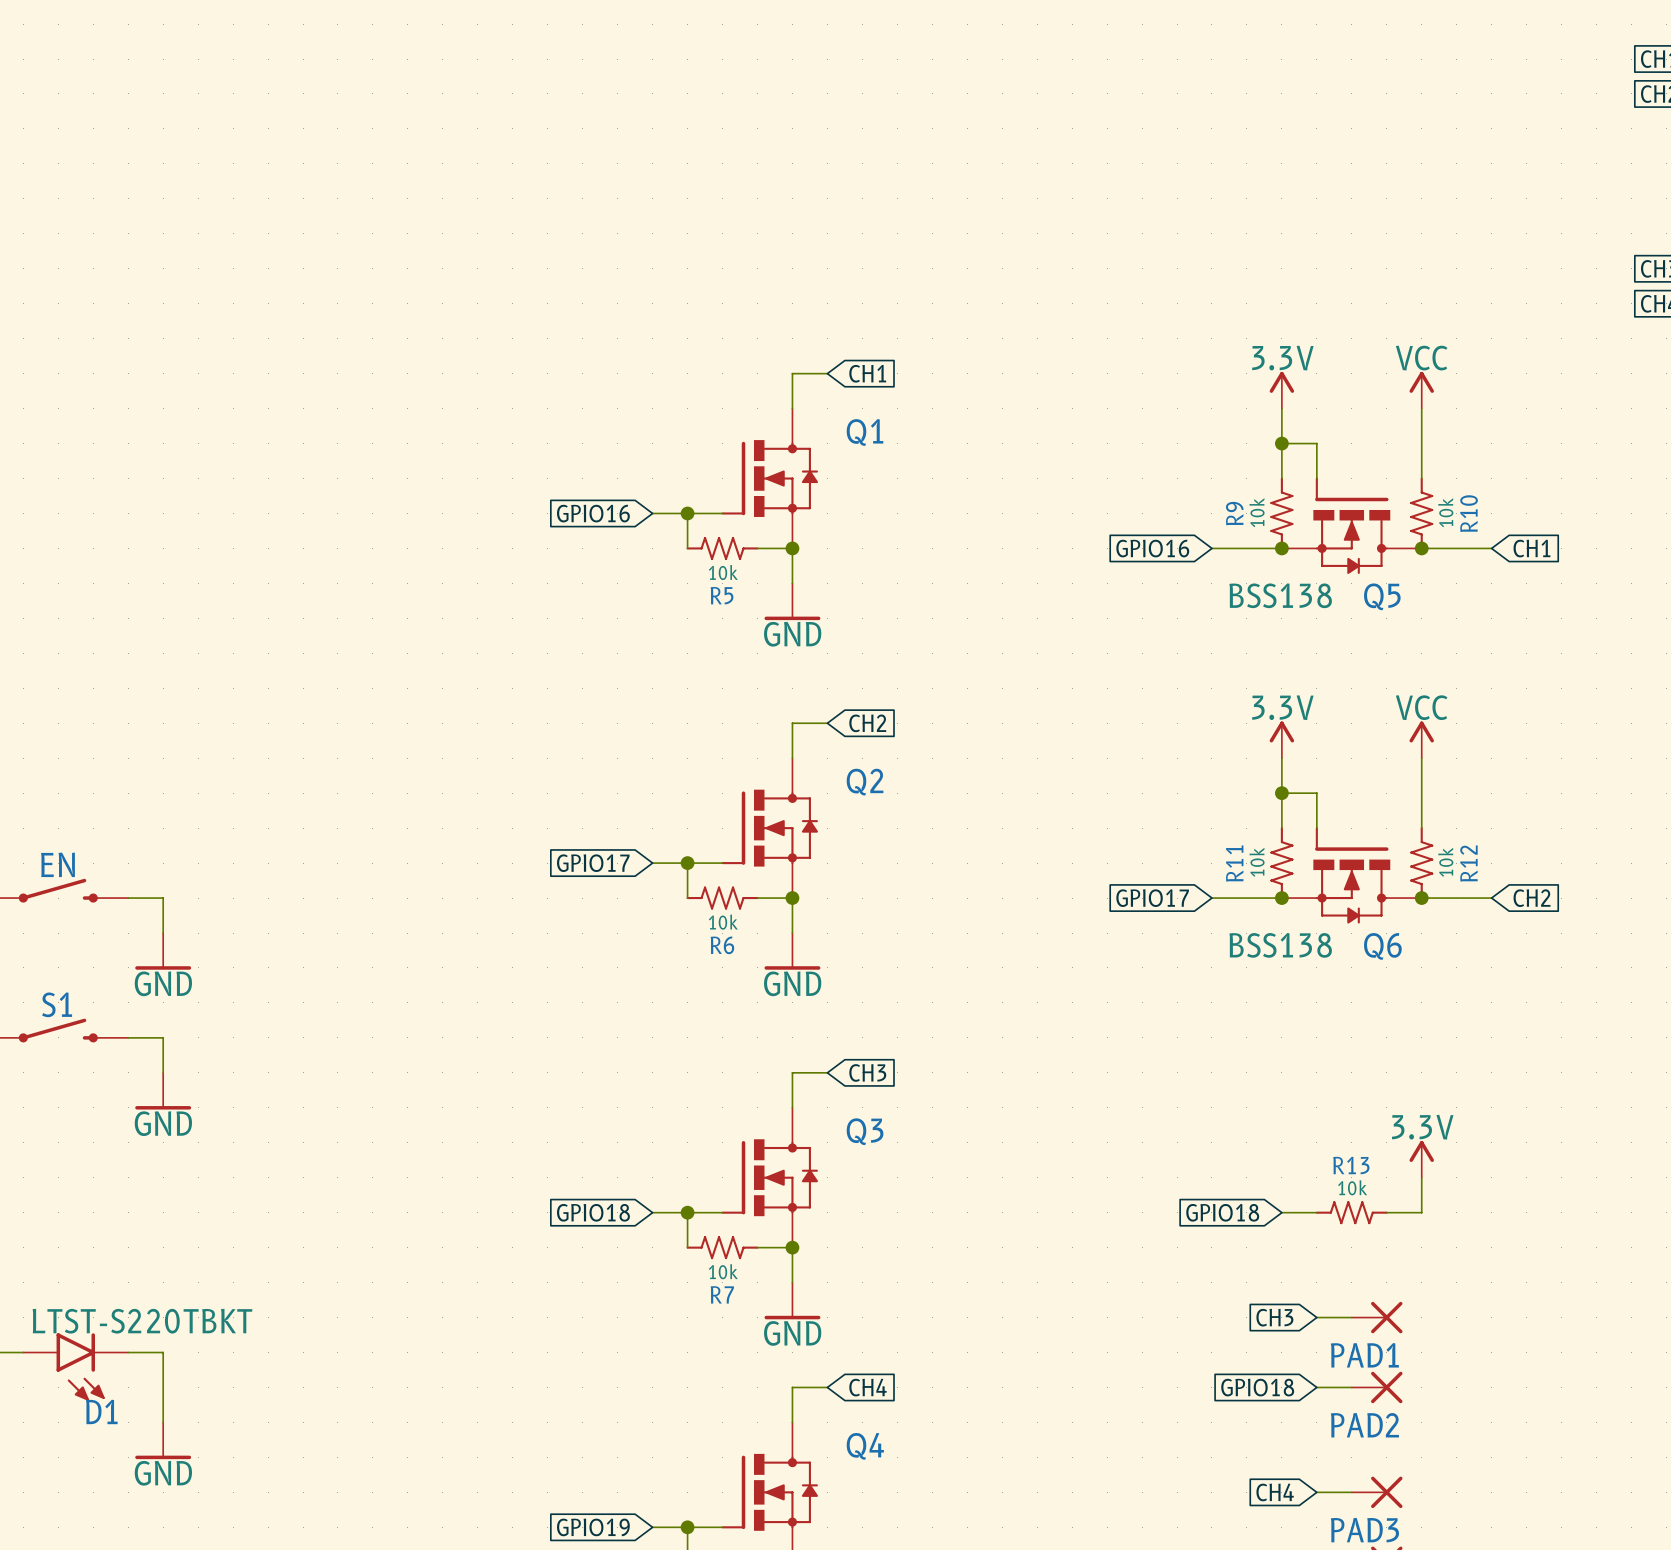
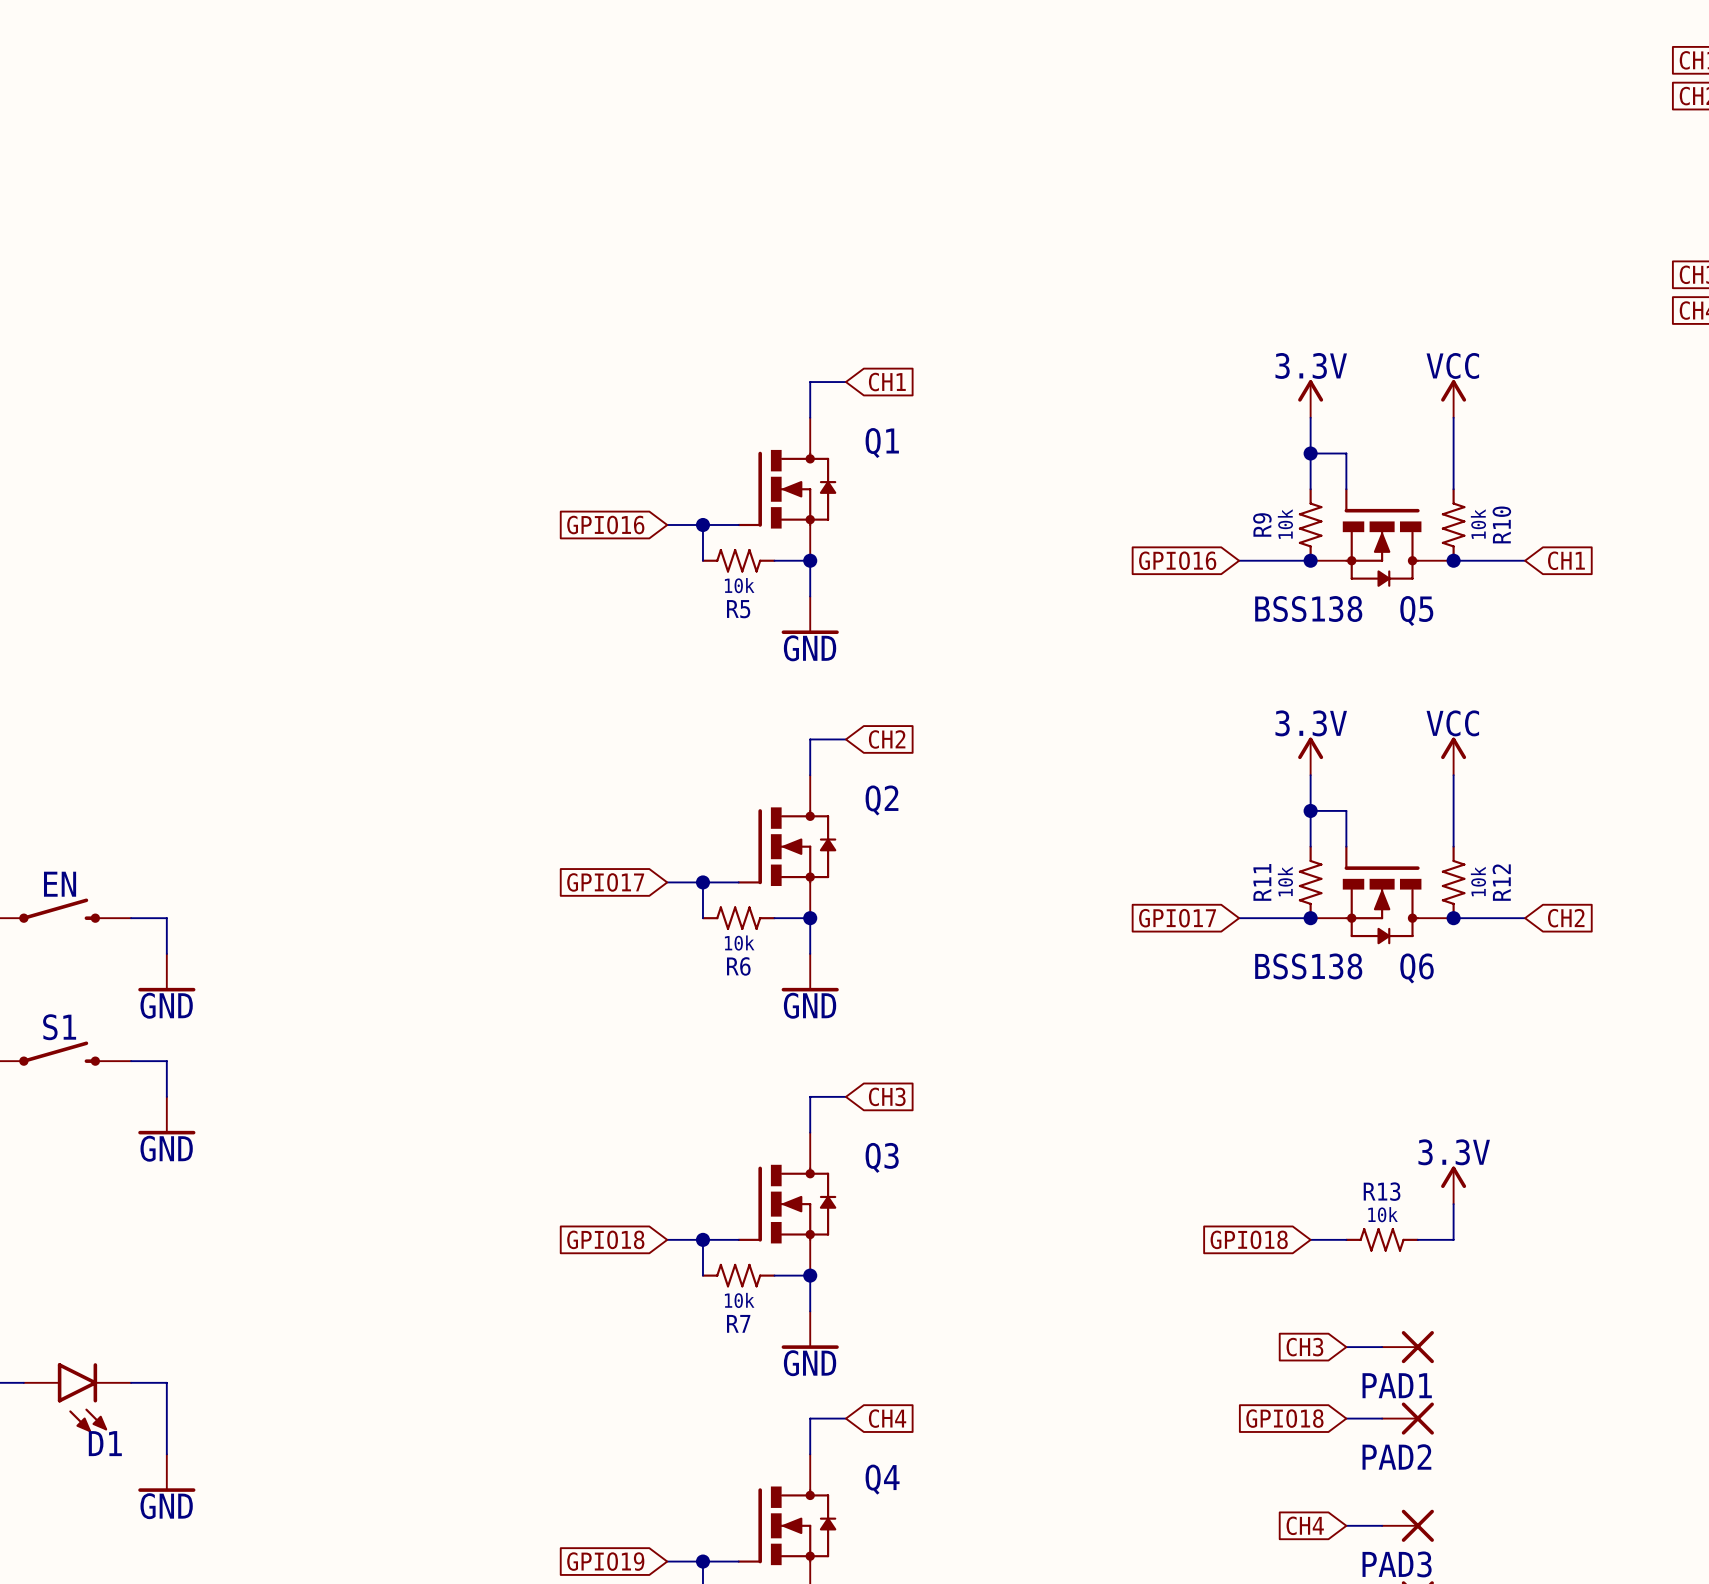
D1 value: LTST-S220TBKT (142, 1321) -> none

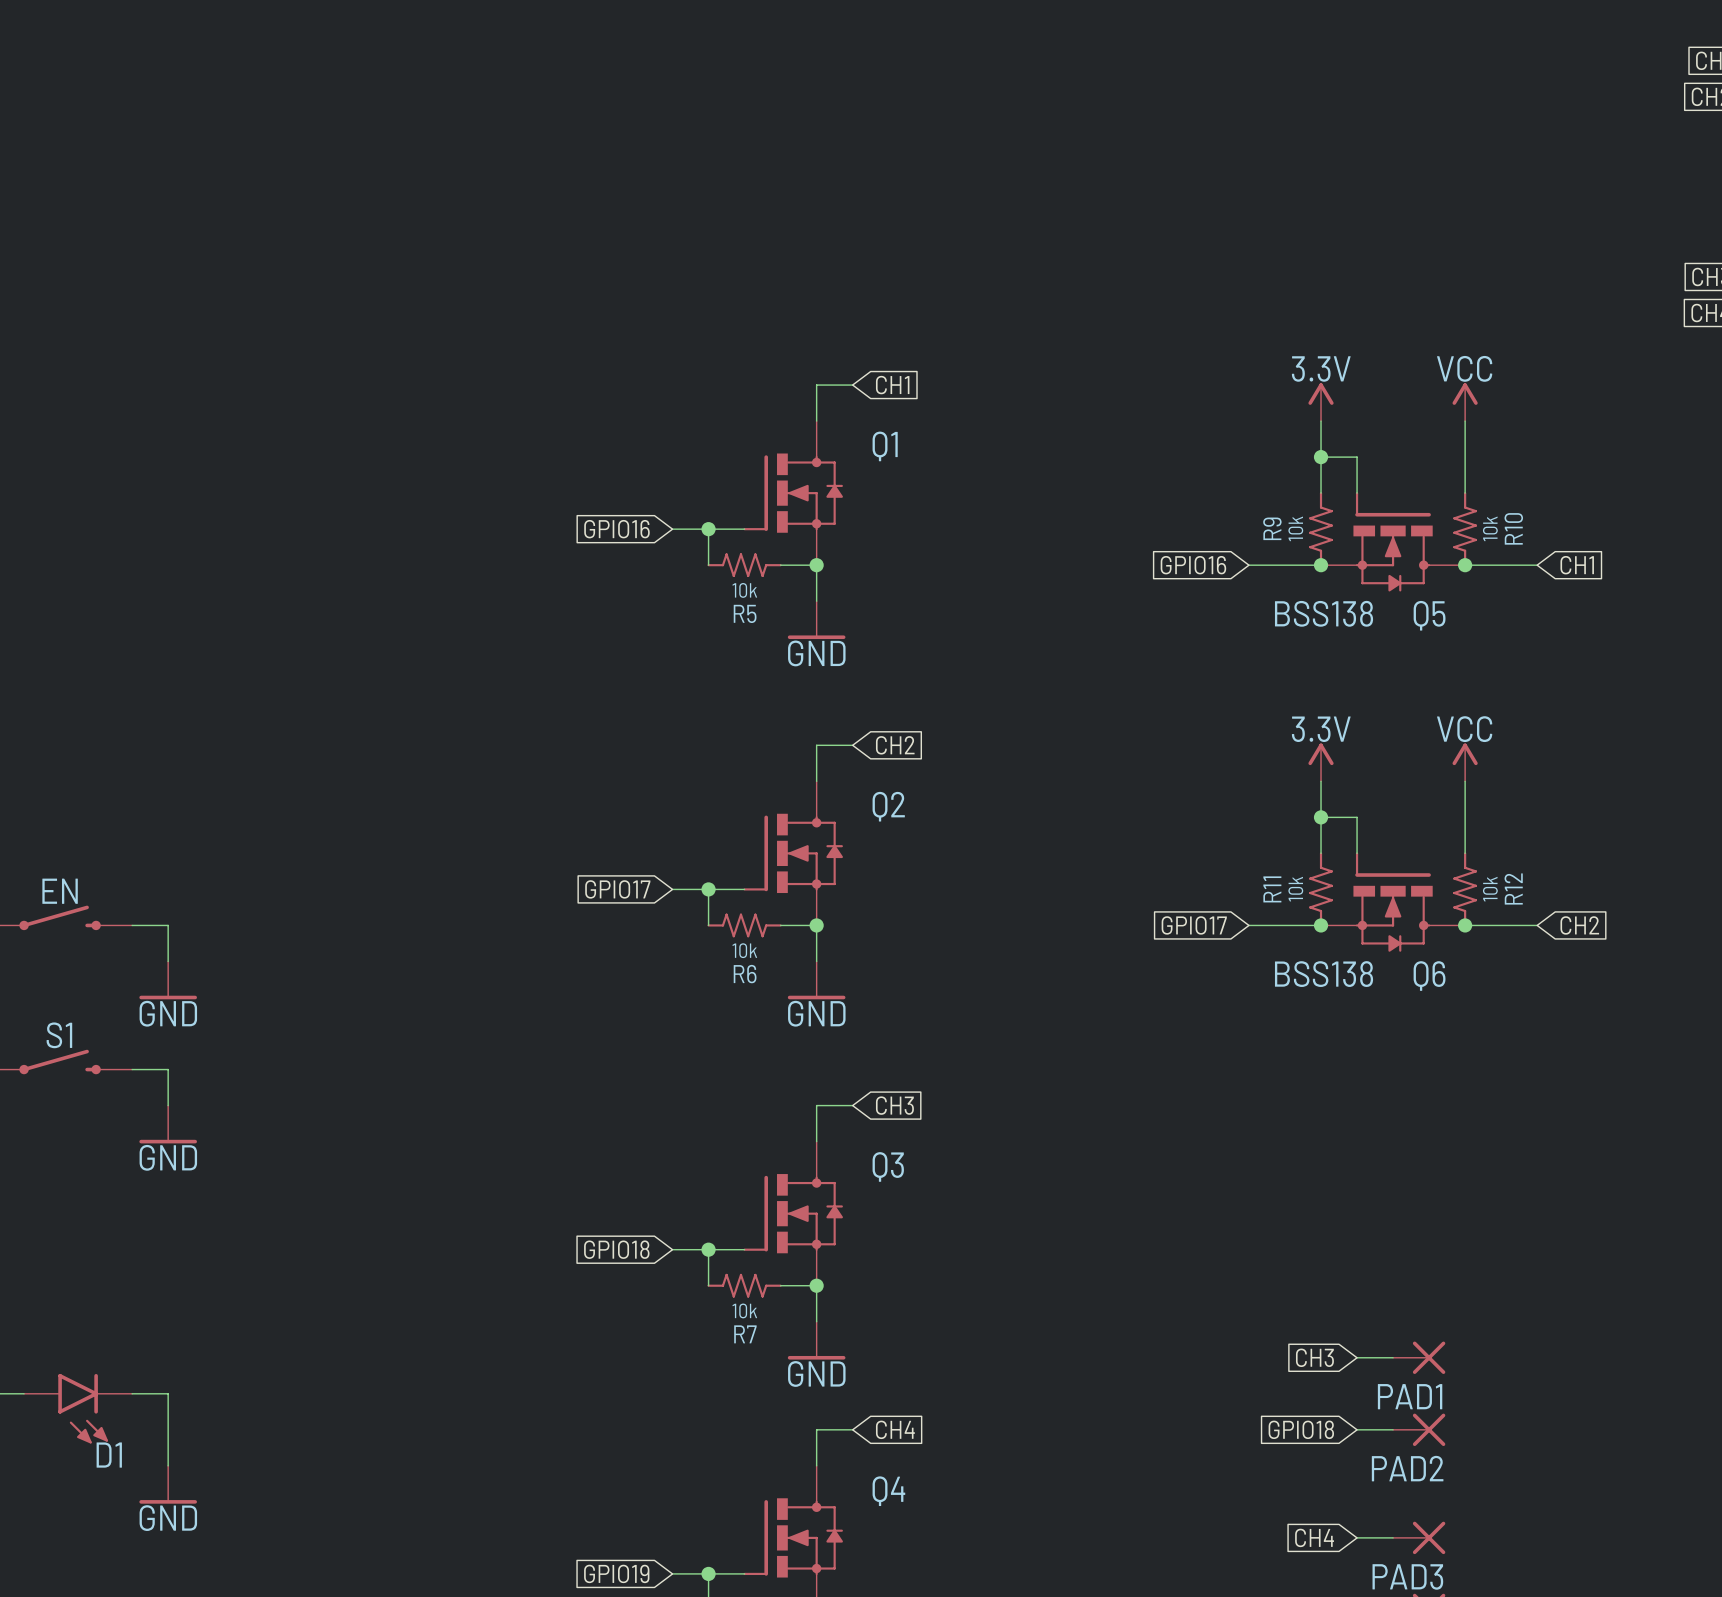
power symbol: 3.3V (1453, 1185) -> none
wire: (1453, 1204) (1453, 1239) (1417, 1239) -> none
global label: GPIO18 (1249, 1239) -> none
wire: (1310, 1239) (1346, 1239) -> none
R13: 10k (1382, 1239) -> none

